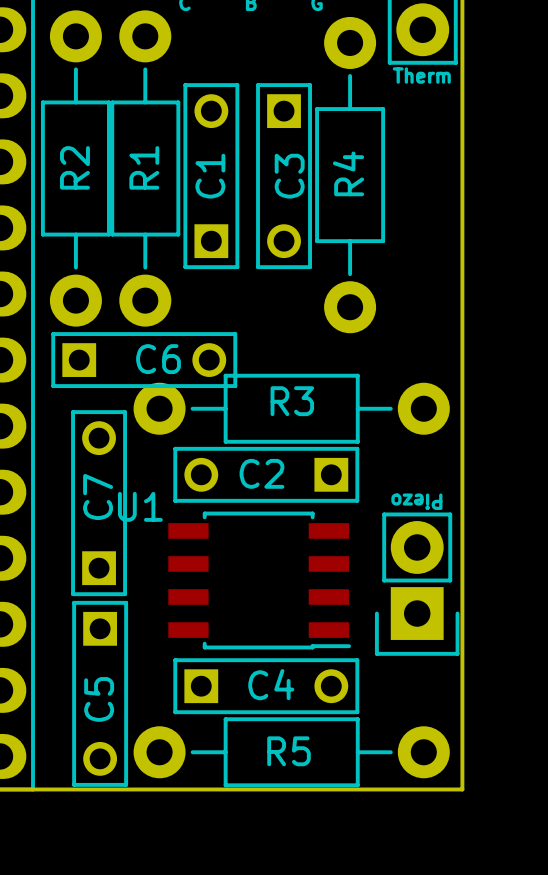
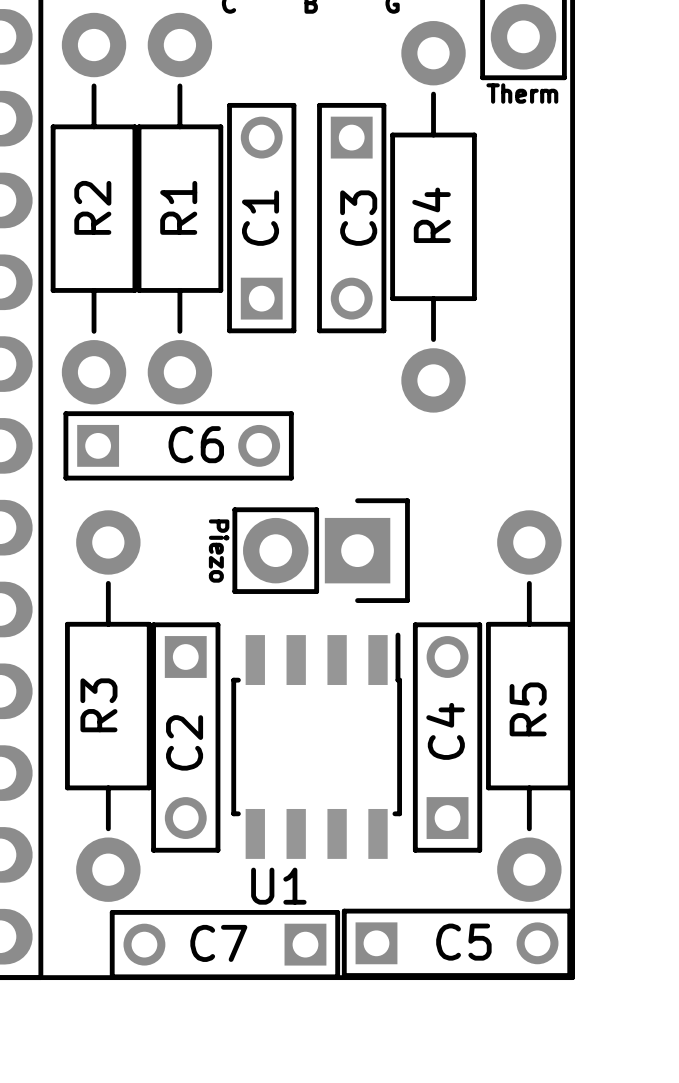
R3 rotation: 0° (291, 408) -> 90° clockwise (108, 706)
R3 position: (291, 408) -> (108, 706)
C2 rotation: 0° (266, 474) -> 90° counterclockwise (185, 737)
C2 position: (266, 474) -> (185, 737)
text rotation: 0° (416, 501) -> 90° counterclockwise (219, 551)
text position: Piezo (416, 501) -> Piezo (219, 551)
C7 rotation: 0° (99, 503) -> 90° counterclockwise (224, 944)
C7 position: (99, 503) -> (224, 944)
U1 rotation: 0° (259, 580) -> 90° counterclockwise (316, 745)
part rotation: 0° (417, 584) -> 90° counterclockwise (321, 550)
part position: (417, 584) -> (321, 550)
C4 rotation: 0° (266, 686) -> 90° counterclockwise (447, 737)
C4 position: (266, 686) -> (447, 737)
C5 rotation: 0° (100, 693) -> 90° counterclockwise (457, 943)
C5 position: (100, 693) -> (457, 943)
R5 rotation: 0° (291, 752) -> 90° clockwise (529, 706)
R5 position: (291, 752) -> (529, 706)

